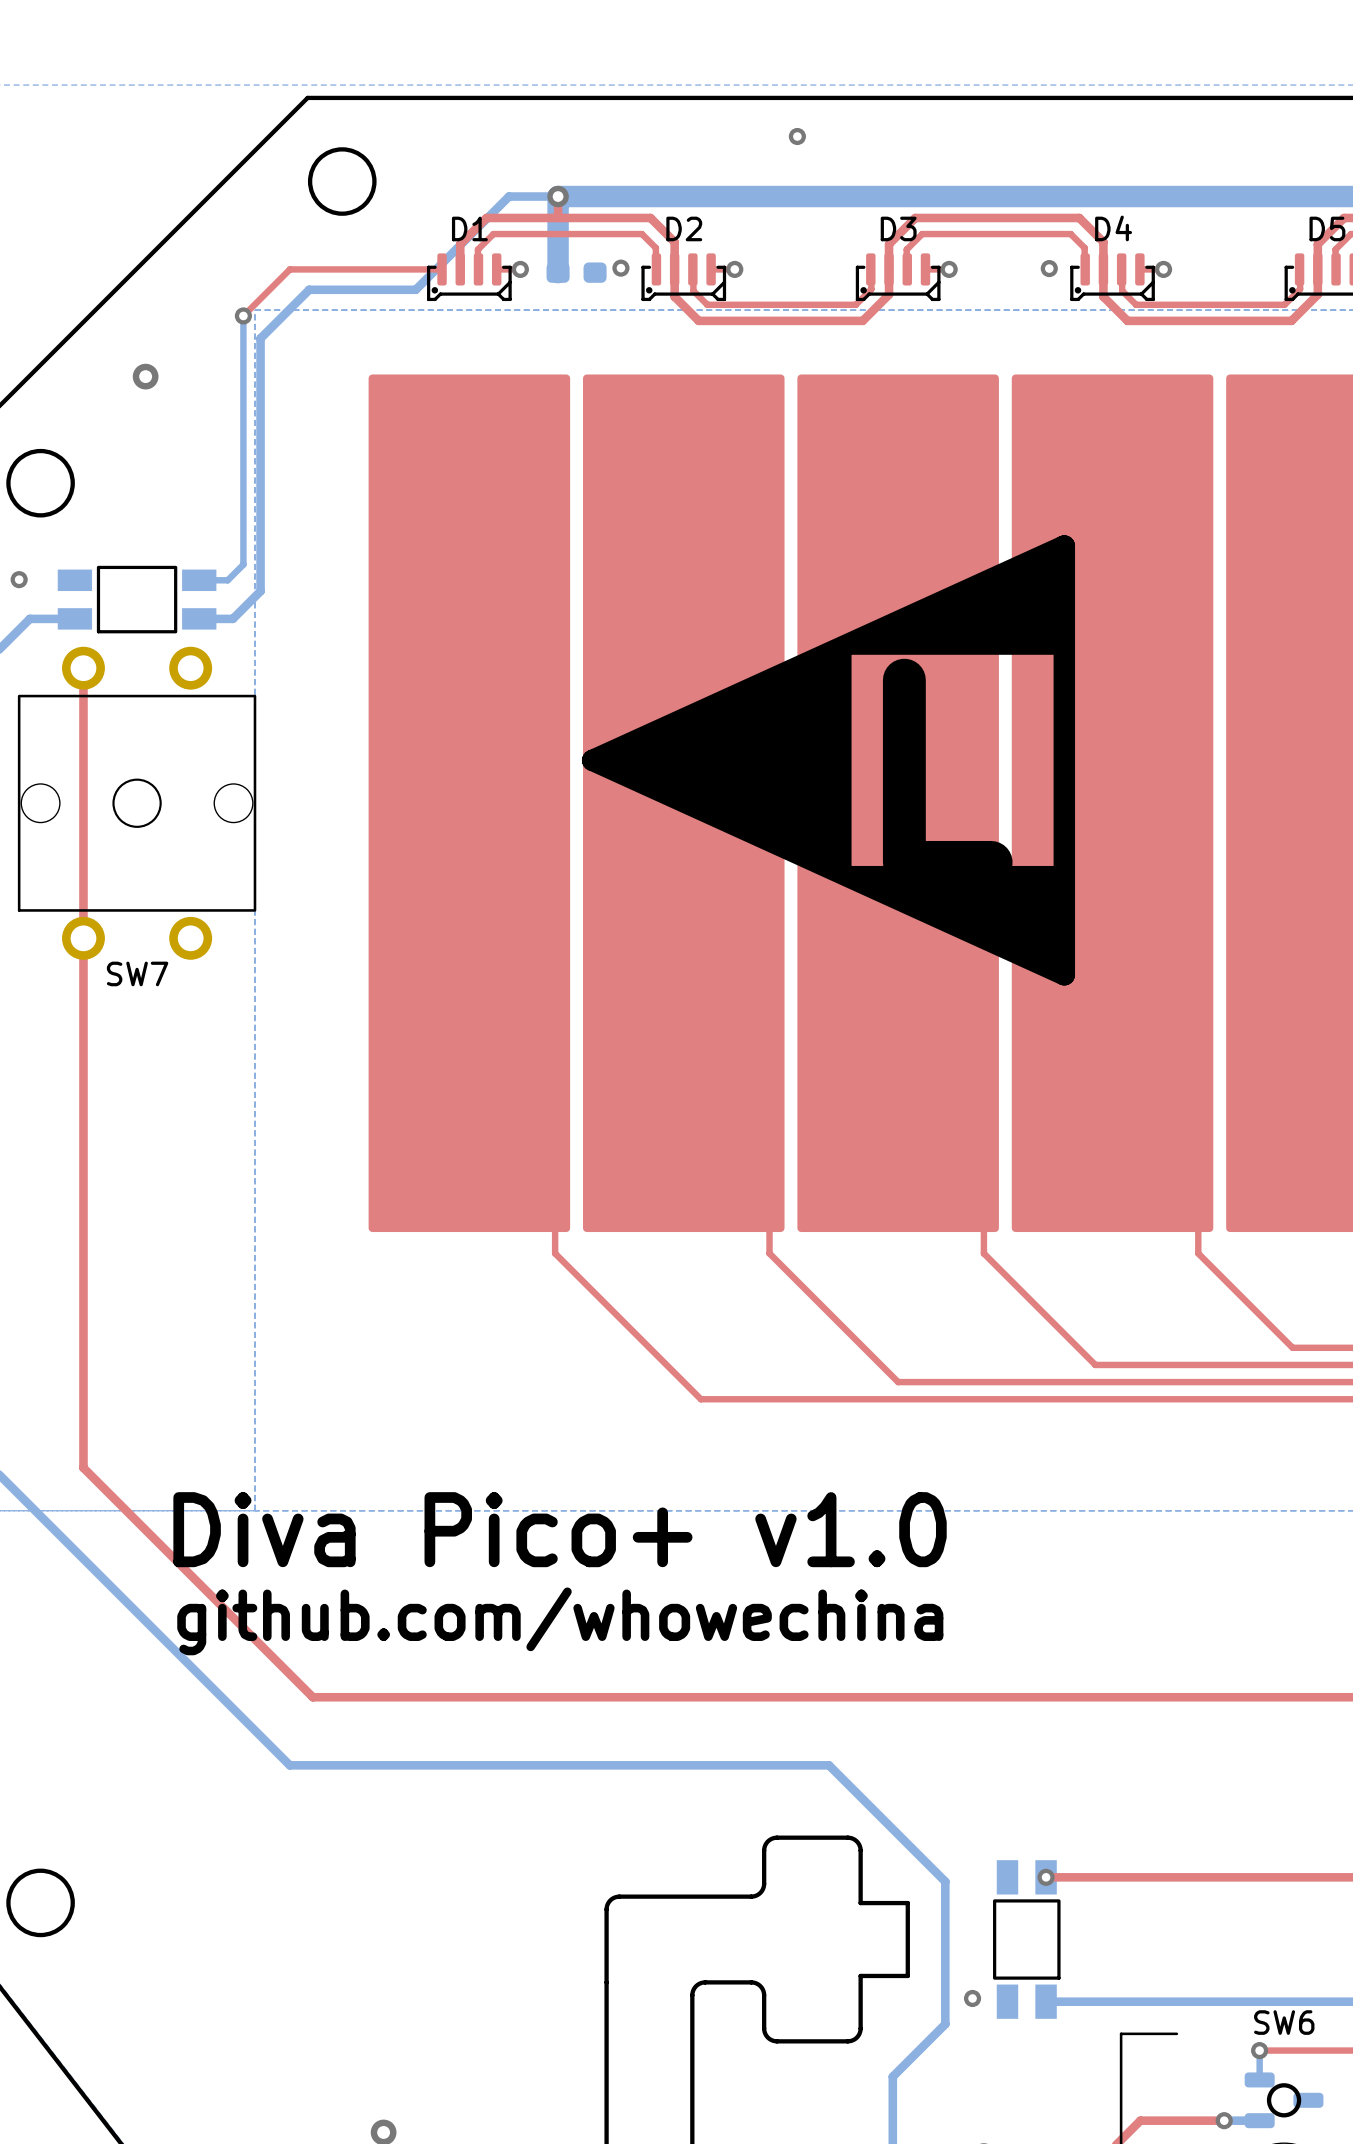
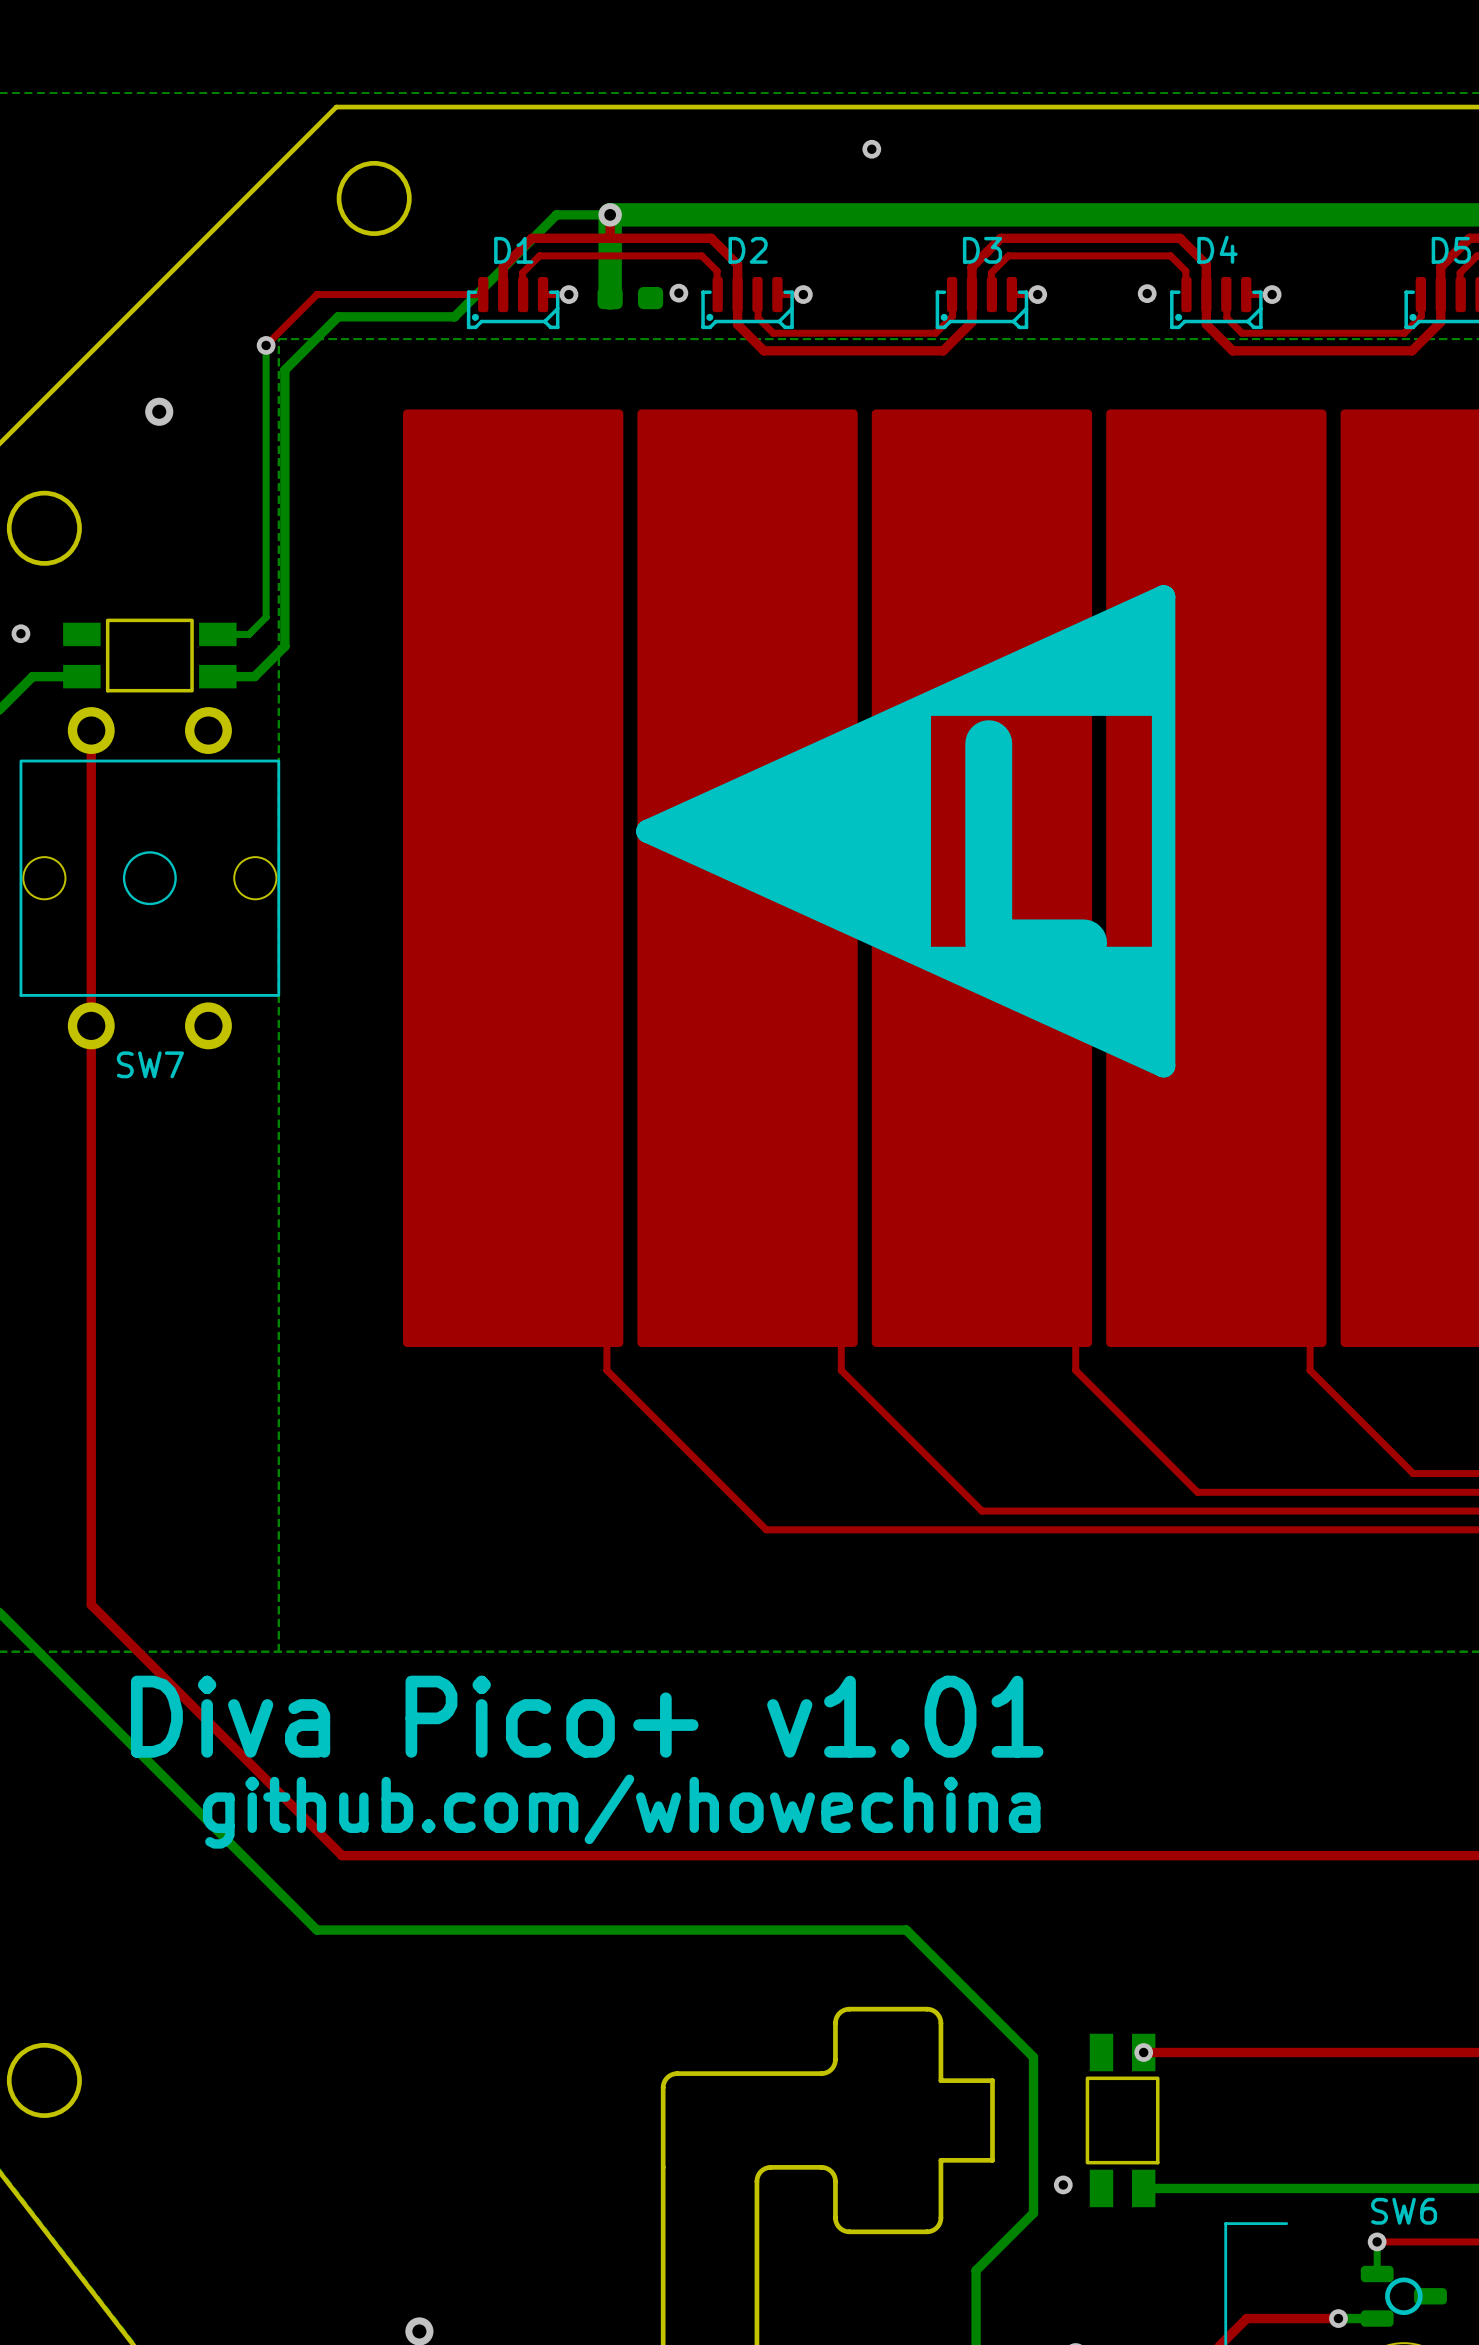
text: Diva Pico+ v1.0 (560, 1529) -> Diva Pico+ v1.01 (587, 1716)
text position: github.com/whowechina (560, 1621) -> github.com/whowechina (621, 1811)

